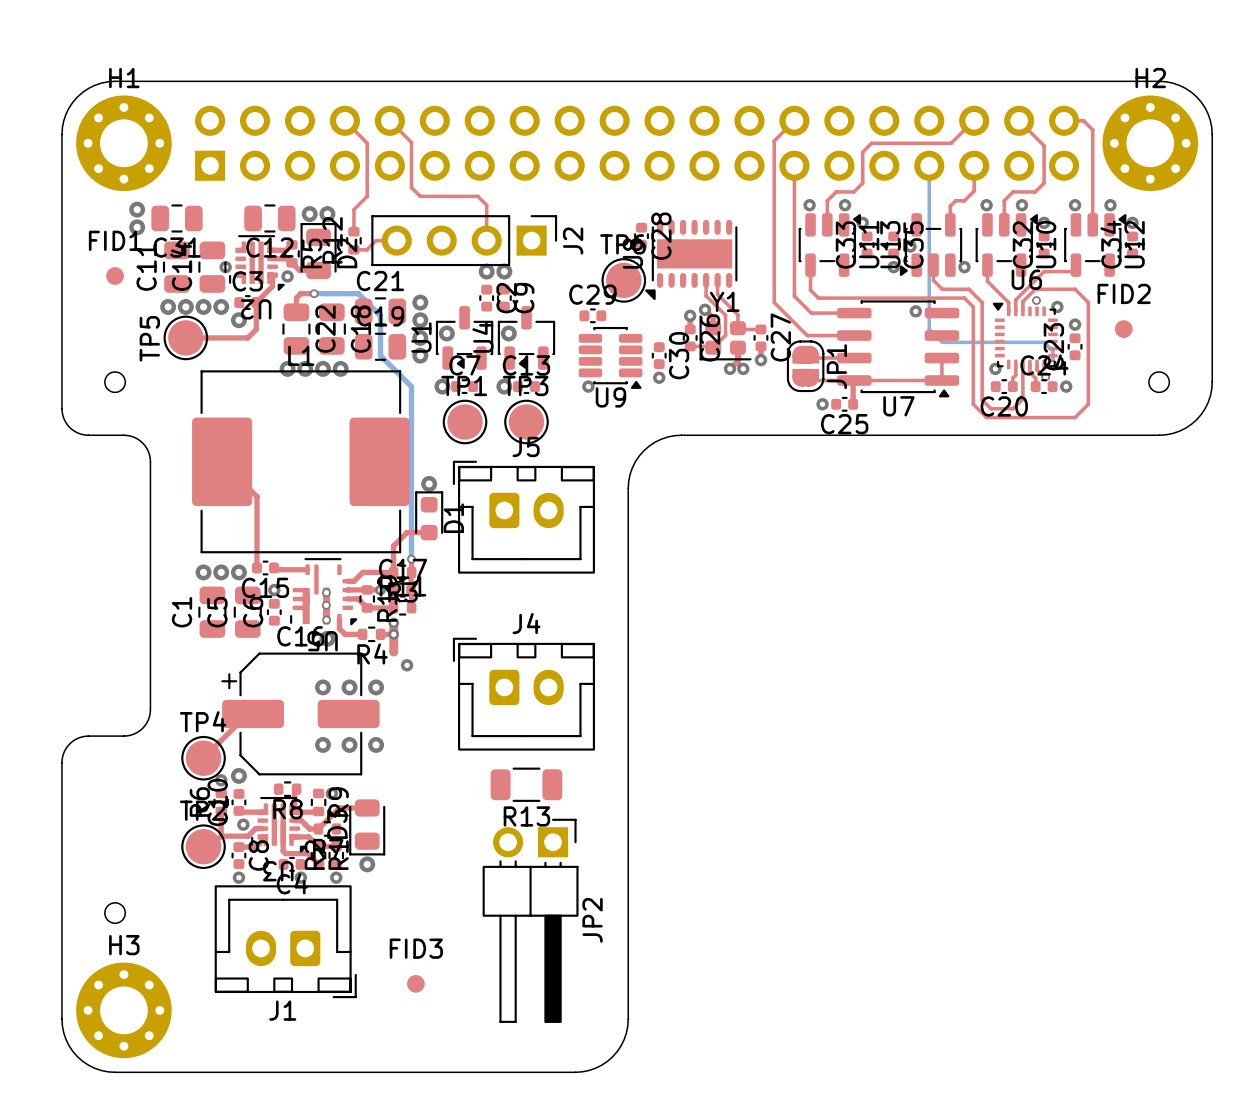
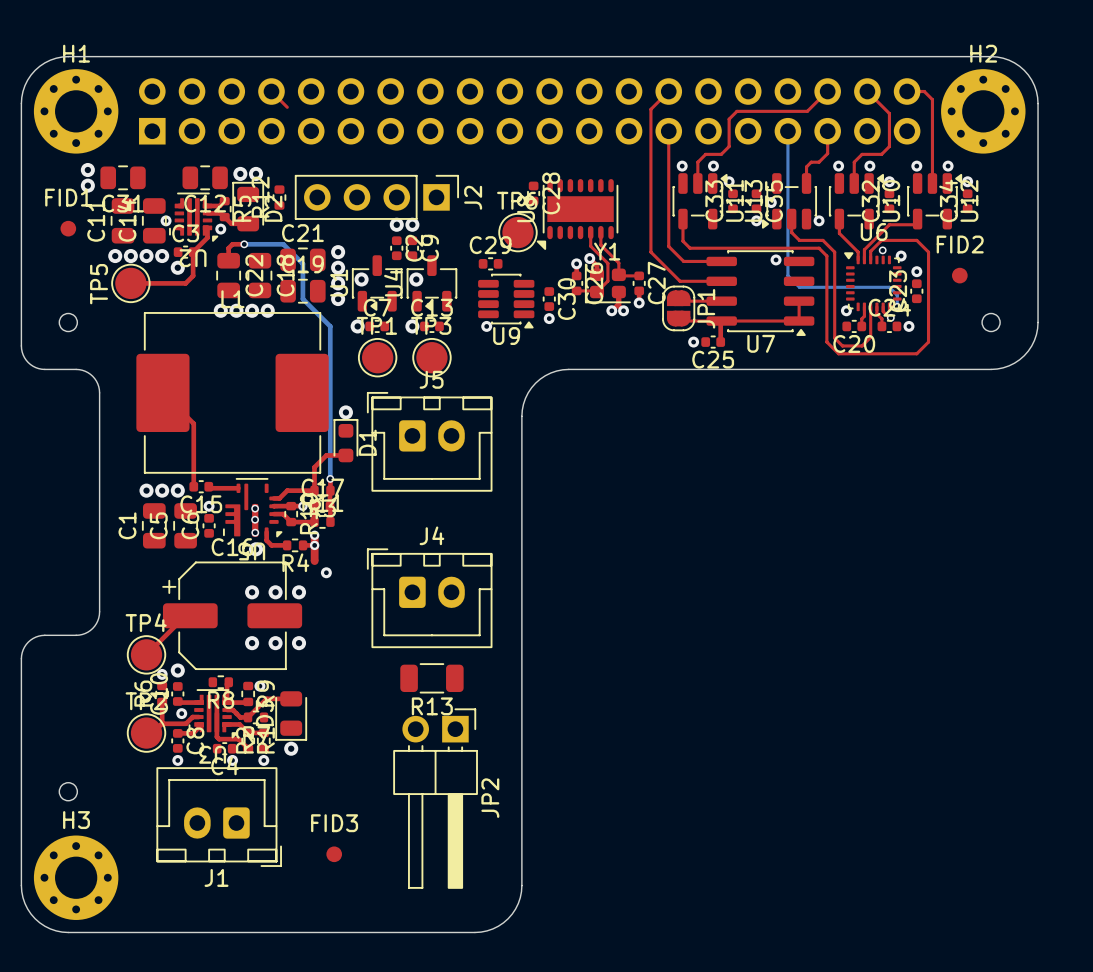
top track: (389, 120) (411, 142) (411, 187) (420, 196) (477, 196) (486, 205) (486, 240) -> none
top track: (362, 138) (367, 143) (367, 196) (353, 209) (353, 231) -> none
top track: (396, 240) (376, 240) (366, 249) (353, 249) -> none

